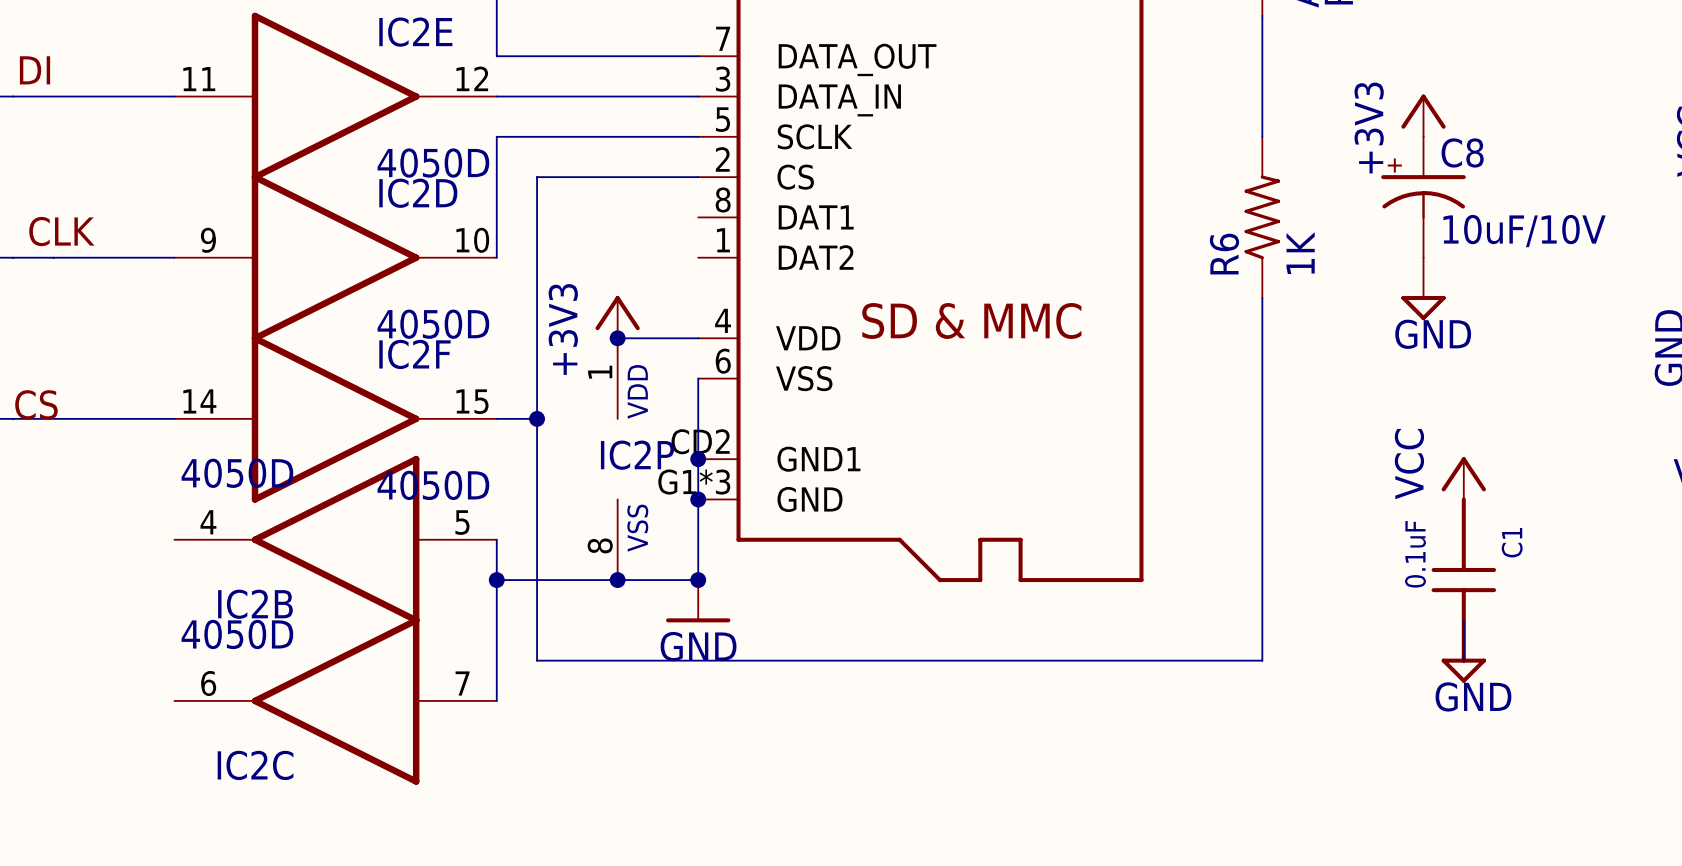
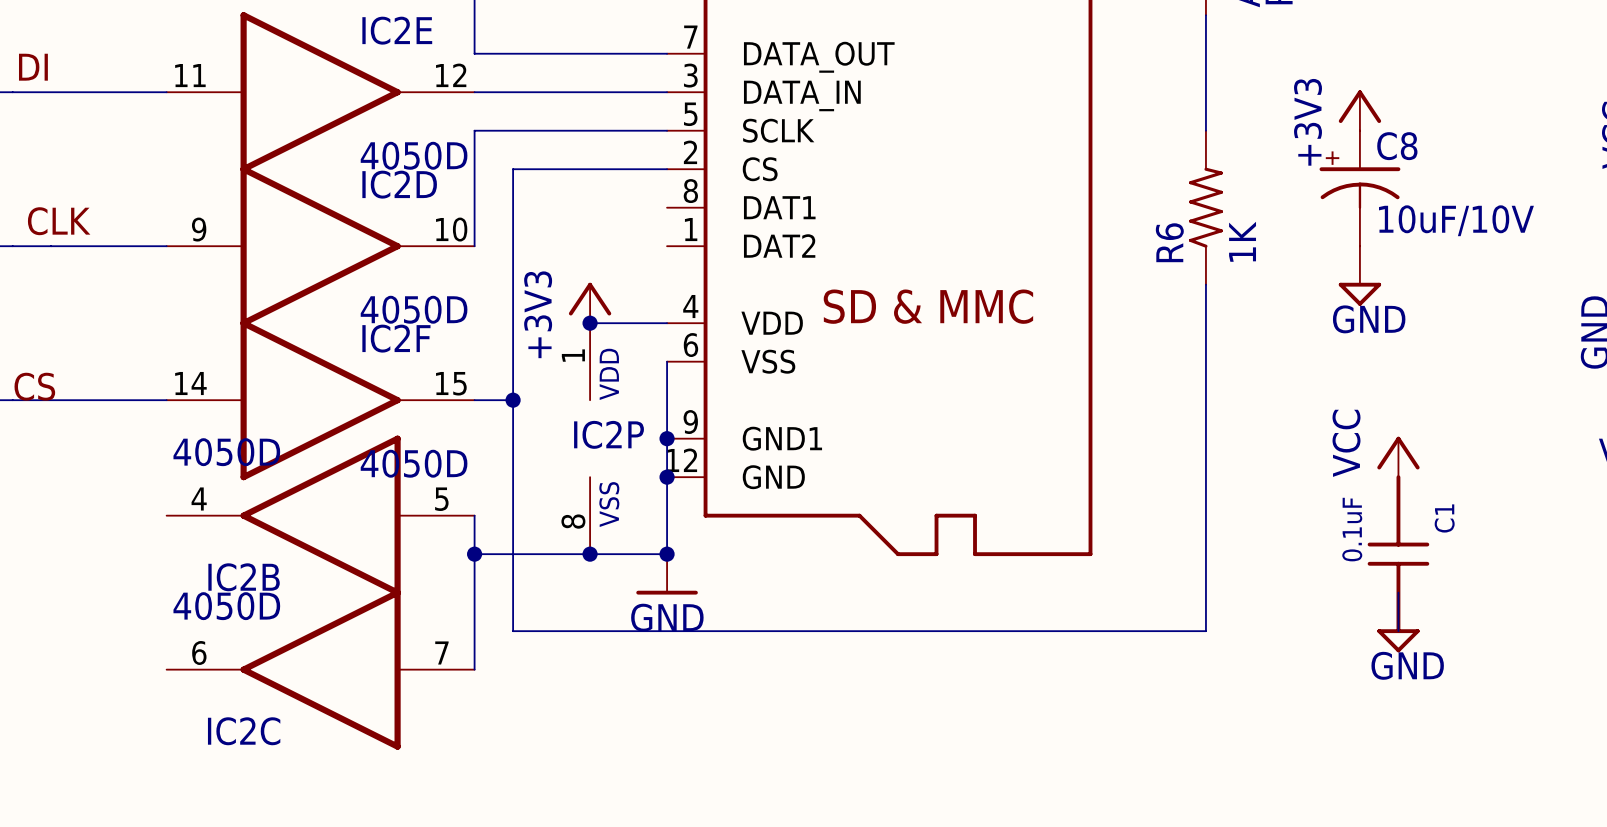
part pin number: CD2 (700, 441) -> 9 (690, 422)
part pin number: G1*3 (694, 482) -> 12 (681, 460)

